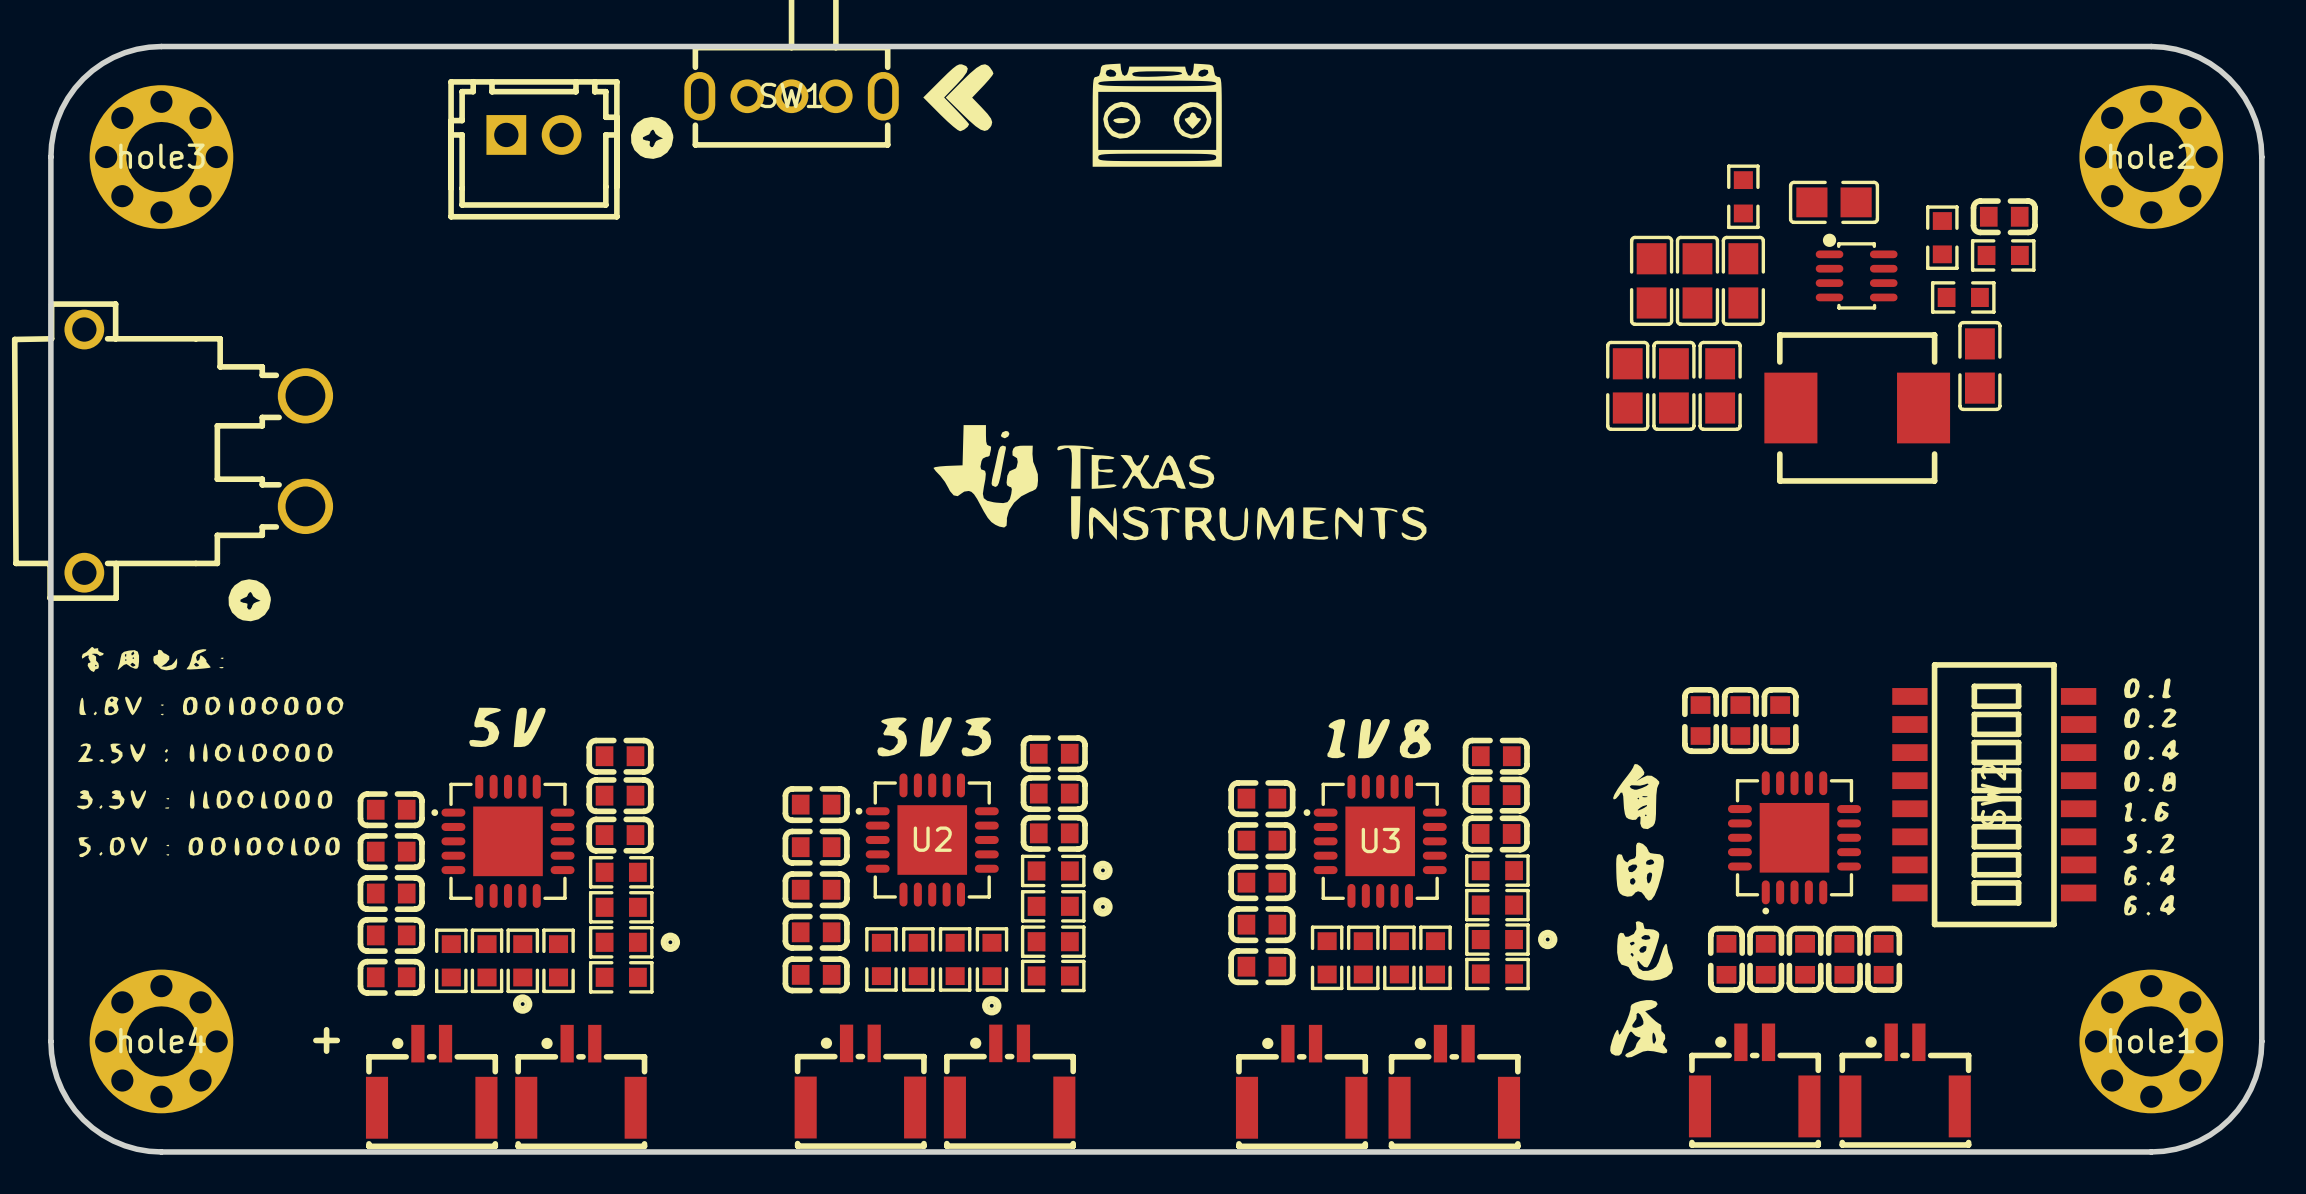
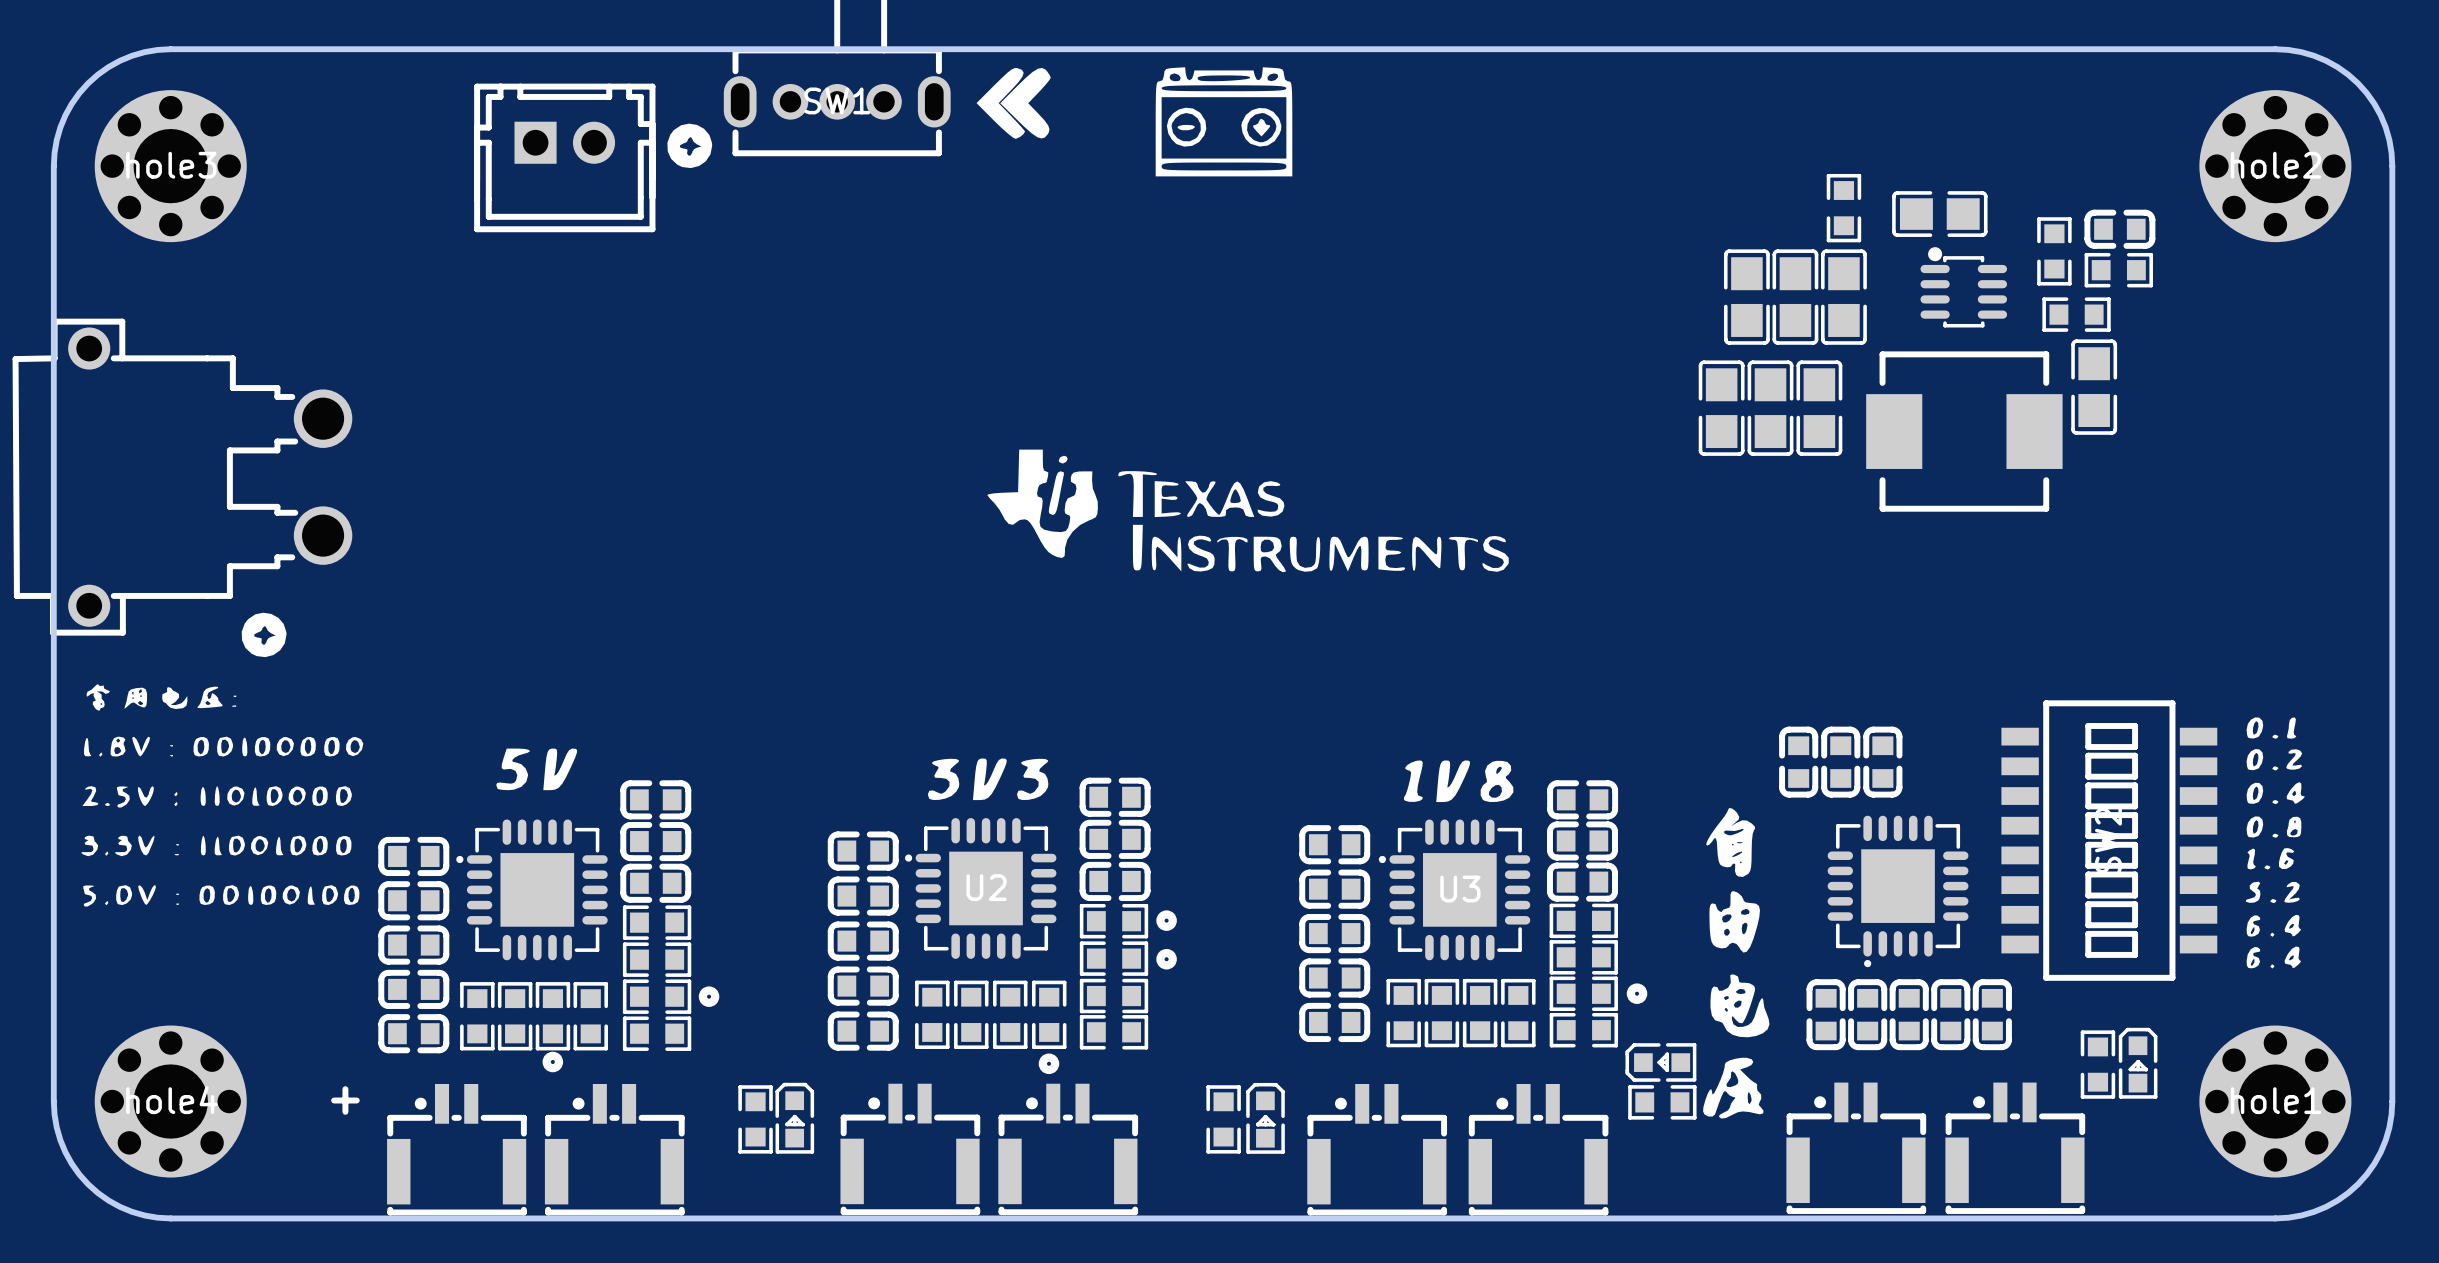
part: none -> (1660, 1062)
part: none -> (2138, 1063)
part: none -> (2097, 1064)
part: none -> (1662, 1102)
part: none -> (794, 1118)
part: none -> (1265, 1118)
part: none -> (755, 1119)
part: none -> (1223, 1119)

